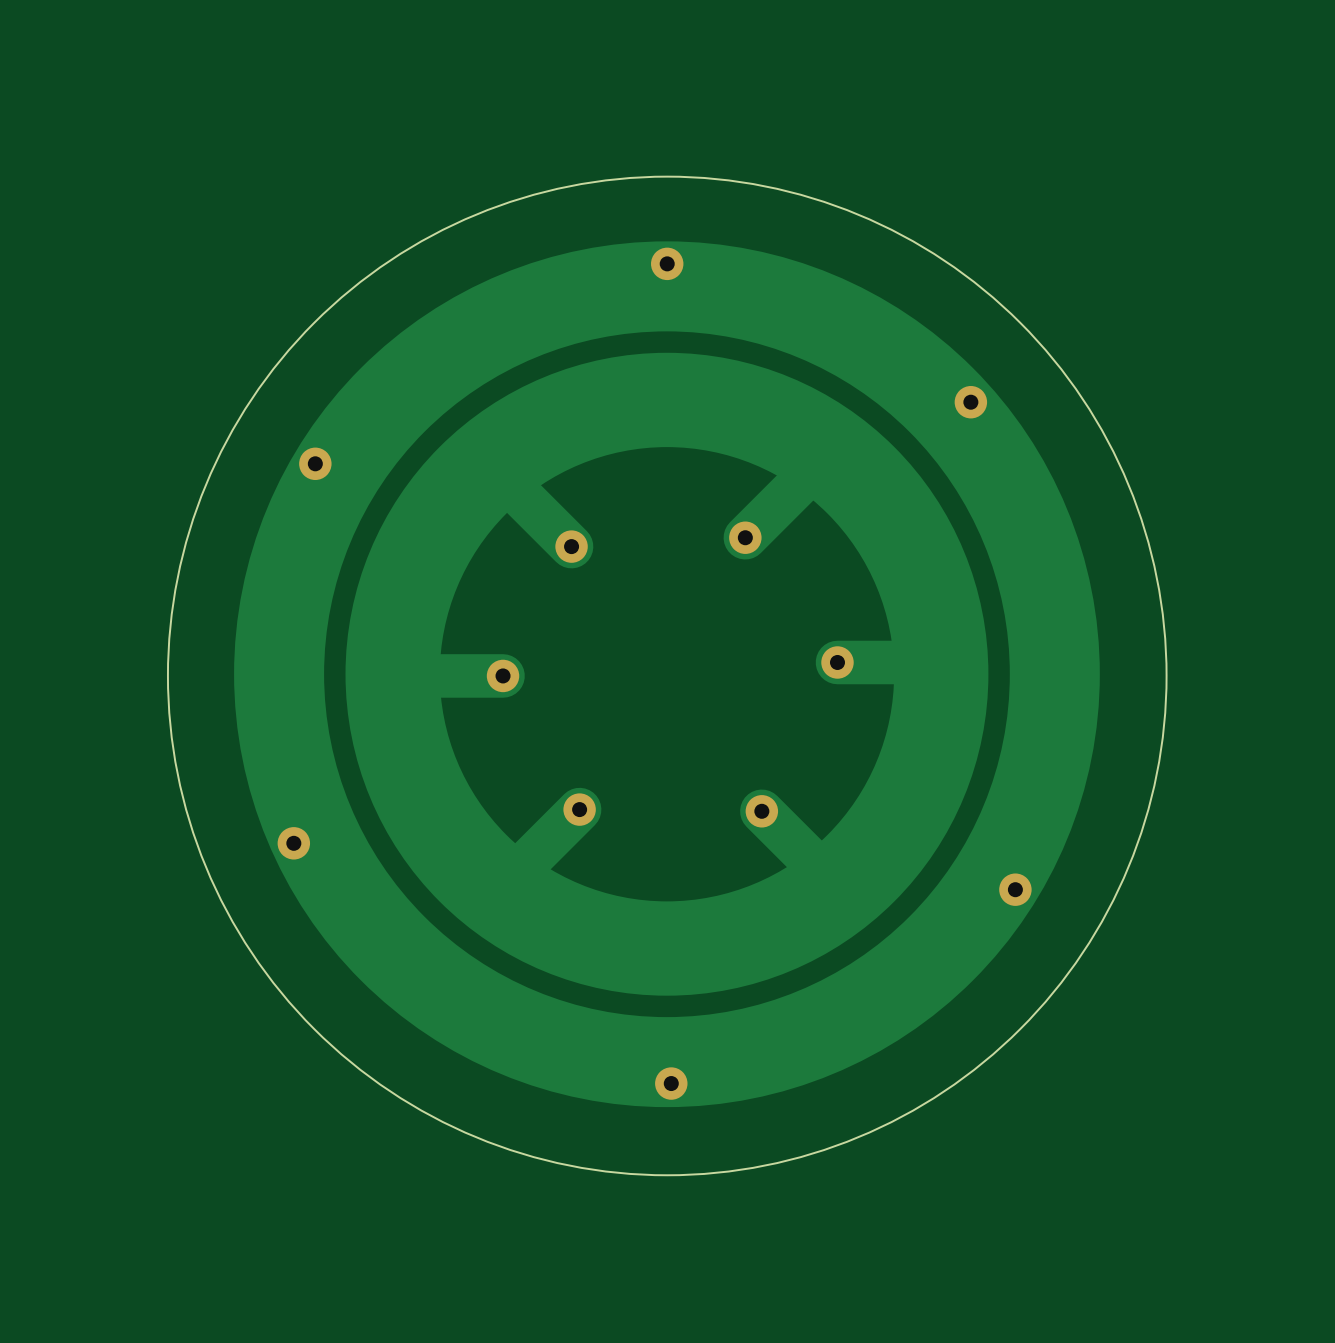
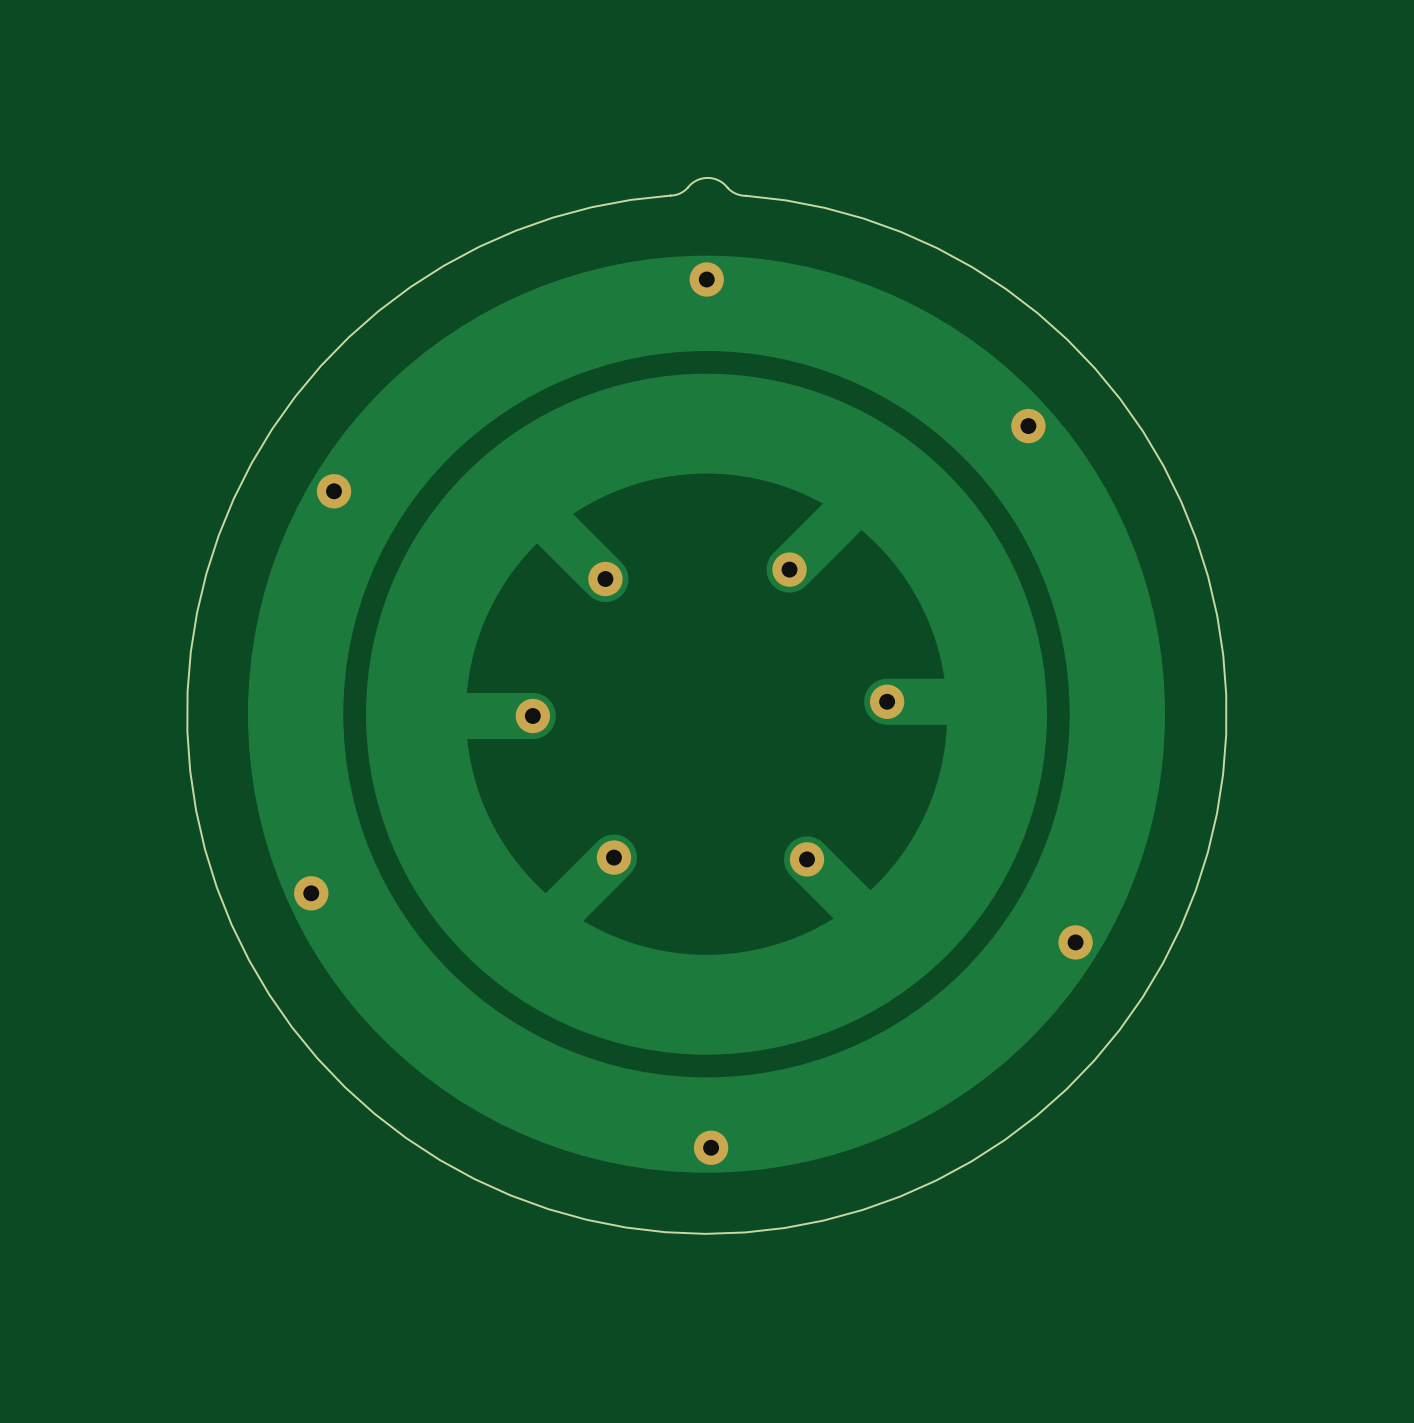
round board edge: [167, 176, 1167, 1176] -> none
board edge: none -> (687, 187) (675, 195) (631, 199) (591, 207) (553, 217) (515, 230) (479, 246) (444, 265) (410, 287) (378, 311) (348, 337) (320, 365) (295, 396) (272, 429) (251, 463) (233, 498) (218, 535) (206, 573) (197, 612) (190, 651) (187, 691) (187, 731) (190, 771) (196, 810) (205, 849) (216, 887) (231, 924) (249, 960) (269, 994) (292, 1027) (317, 1058) (344, 1087) (374, 1113) (406, 1138) (439, 1159) (474, 1179) (510, 1195) (548, 1209) (586, 1219) (625, 1227) (665, 1232) (705, 1233) (745, 1232) (784, 1228) (823, 1220) (862, 1210) (899, 1196) (936, 1180) (971, 1161) (1004, 1139) (1036, 1115) (1066, 1089) (1094, 1060) (1119, 1029) (1142, 997) (1163, 963) (1180, 927) (1195, 890) (1207, 852) (1216, 813) (1223, 774) (1226, 734) (1226, 694) (1223, 654) (1217, 615) (1208, 576) (1196, 538) (1181, 501) (1163, 465) (1143, 431) (1120, 399) (1094, 368) (1067, 339) (1037, 313) (1005, 288) (972, 267) (937, 248) (900, 231) (863, 218) (824, 207) (785, 200) (738, 194) (713, 178) (699, 179) (687, 187)

